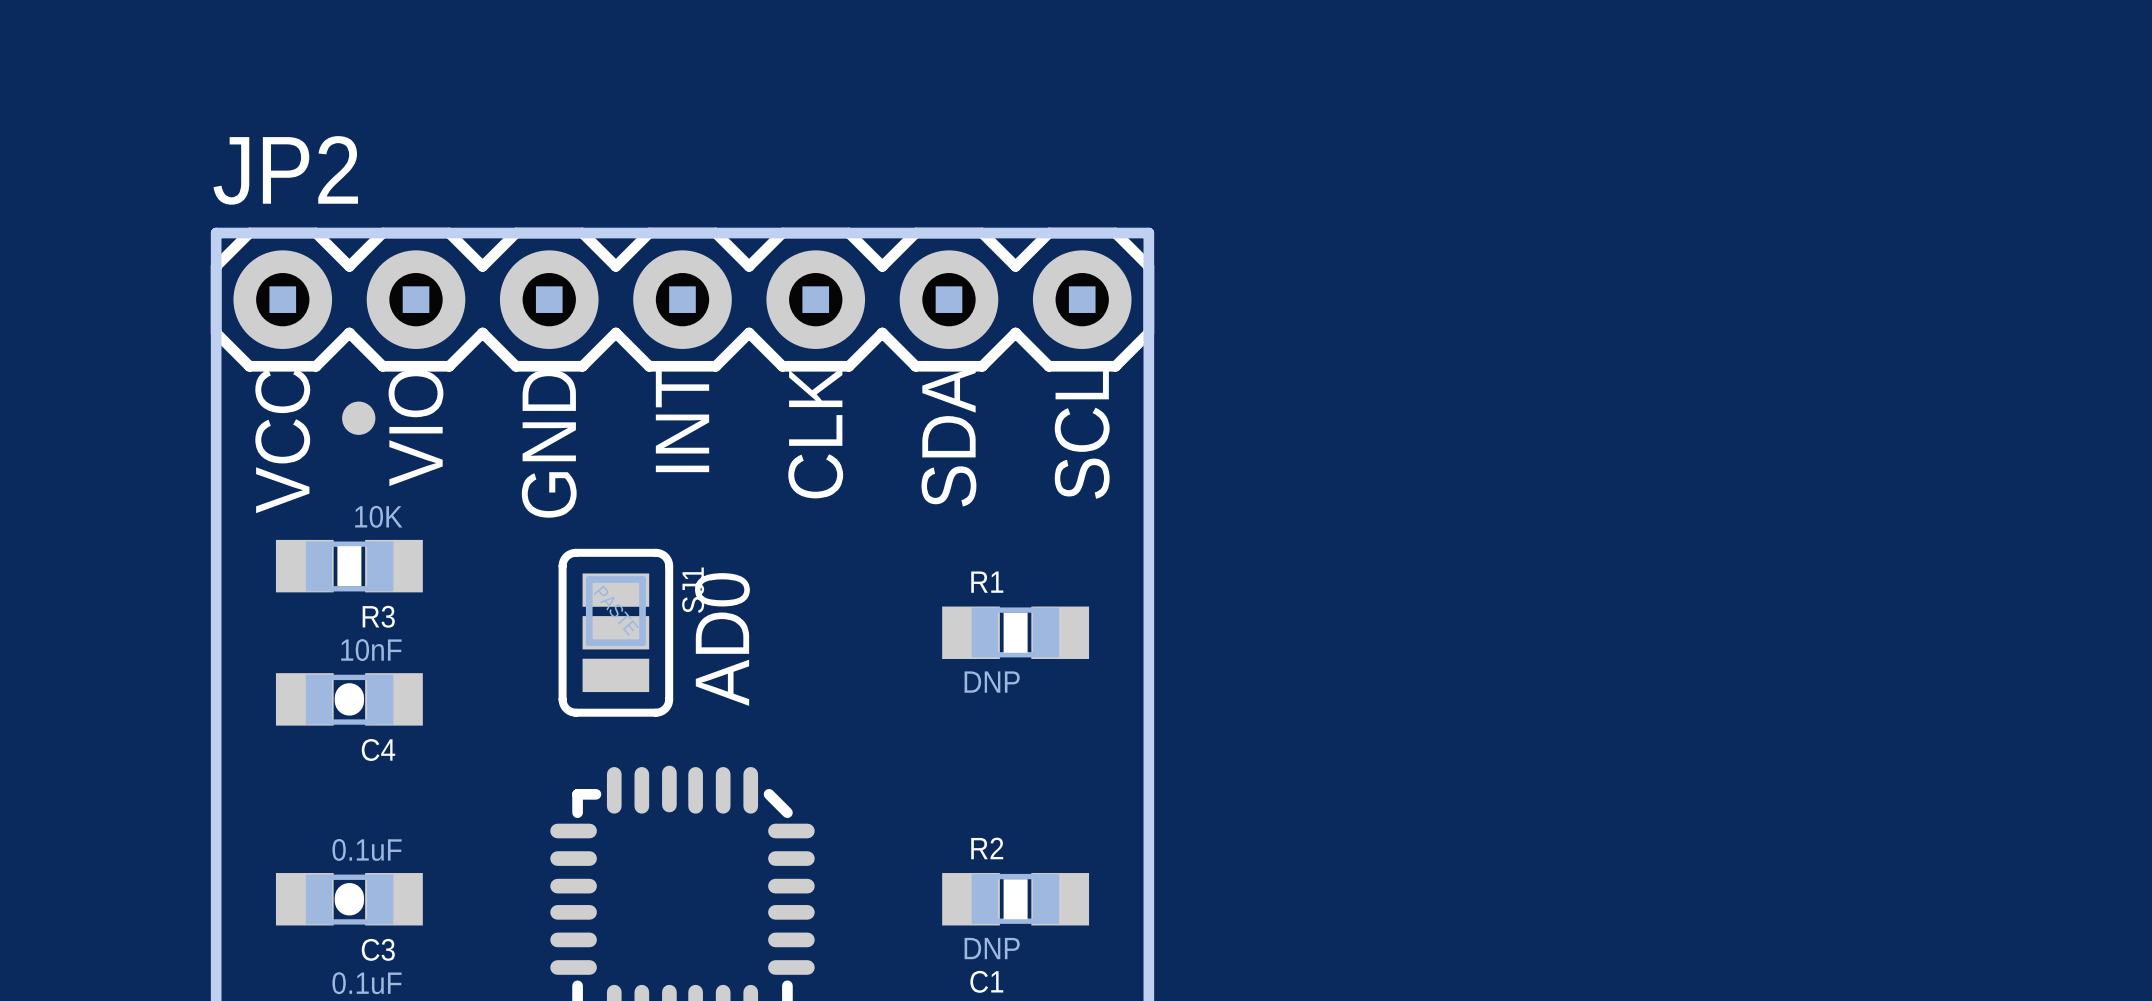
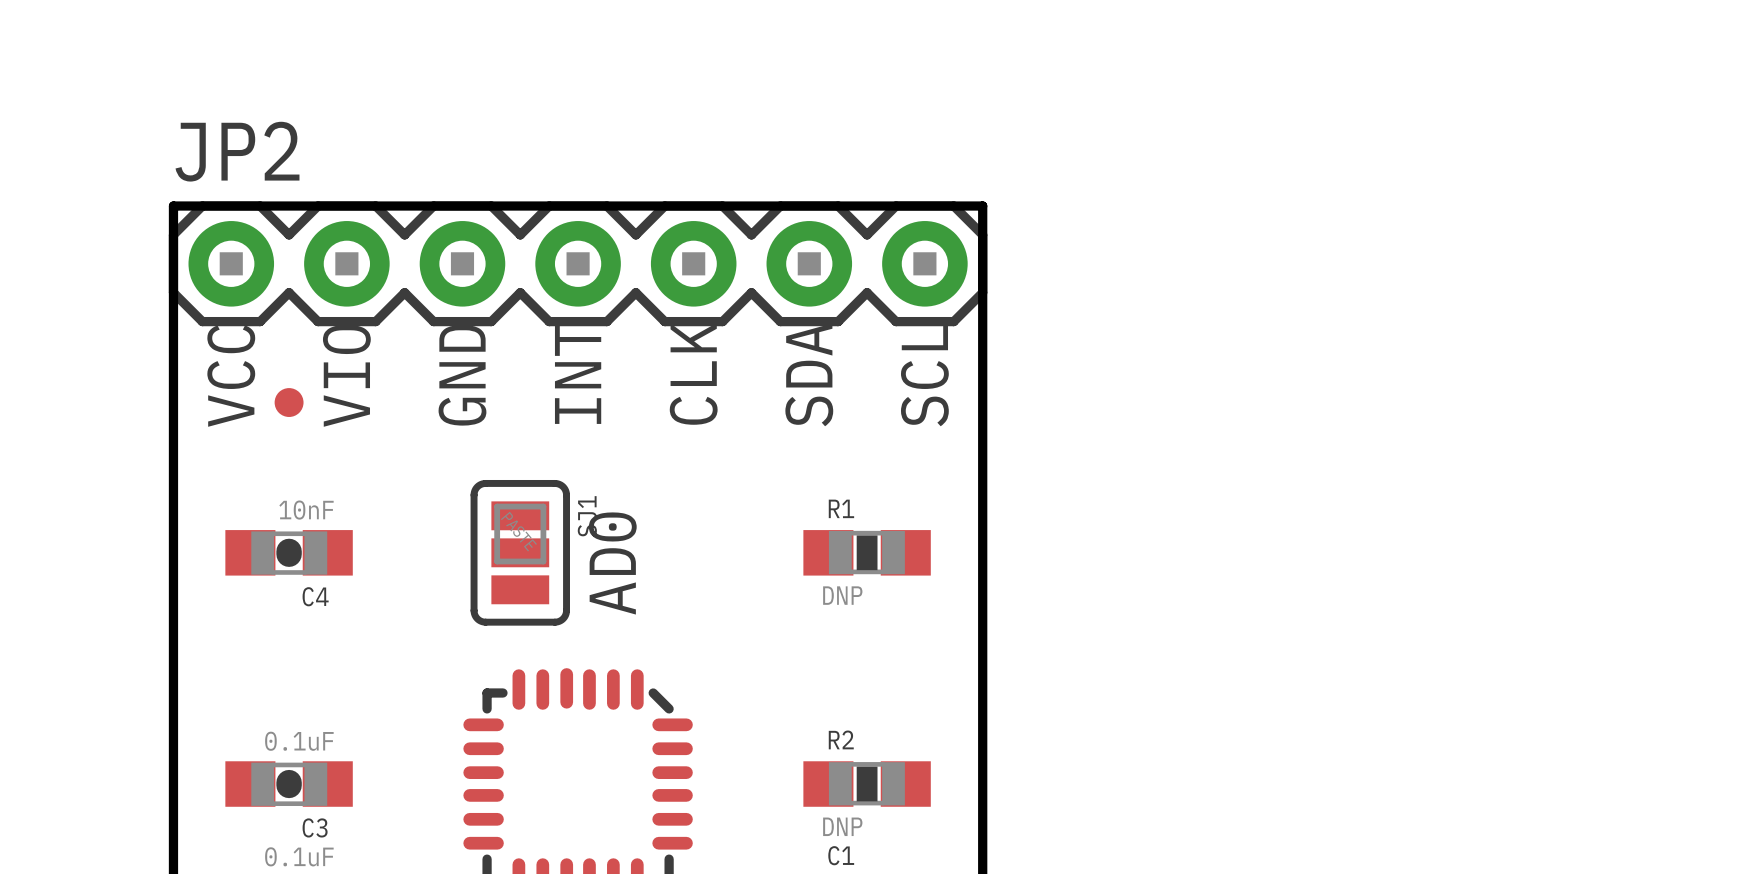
part position: (358, 418) -> (289, 402)
R3: 10K (349, 566) -> none
C4 position: (349, 699) -> (289, 552)

